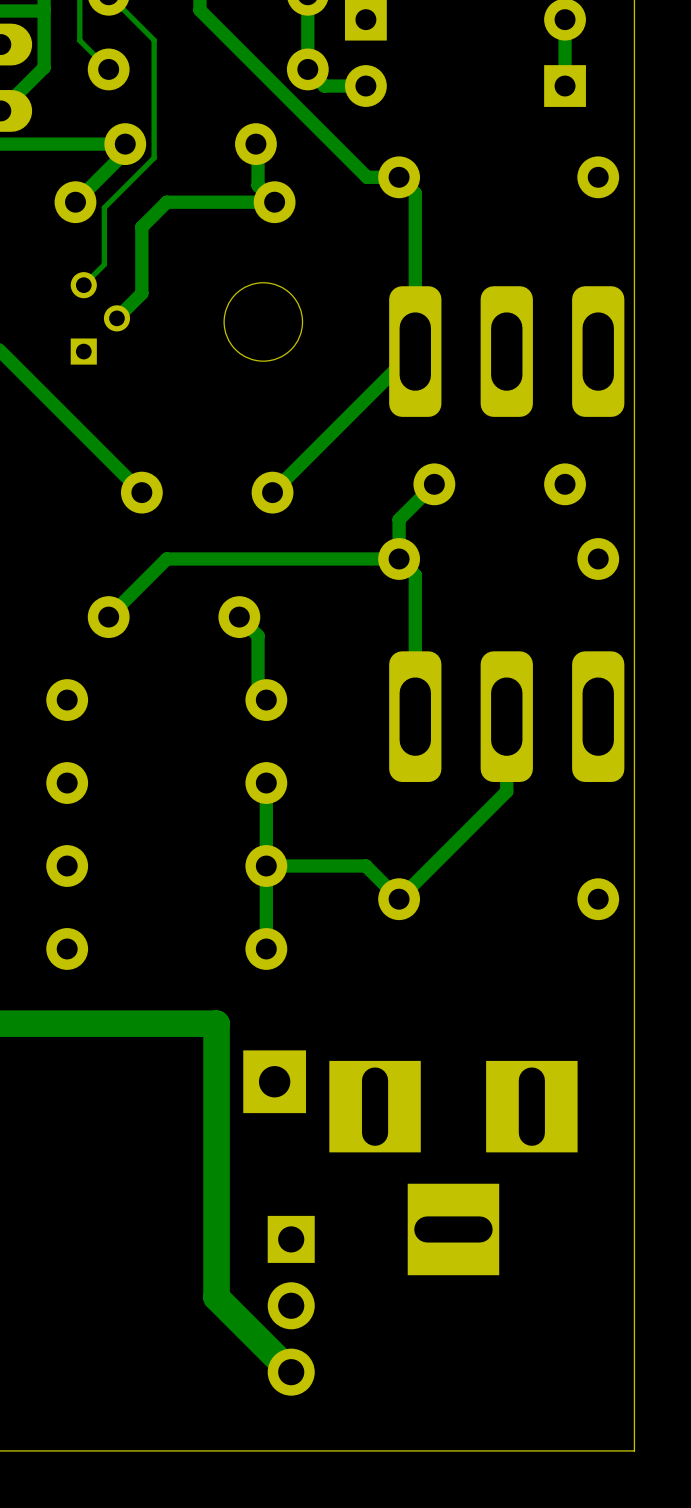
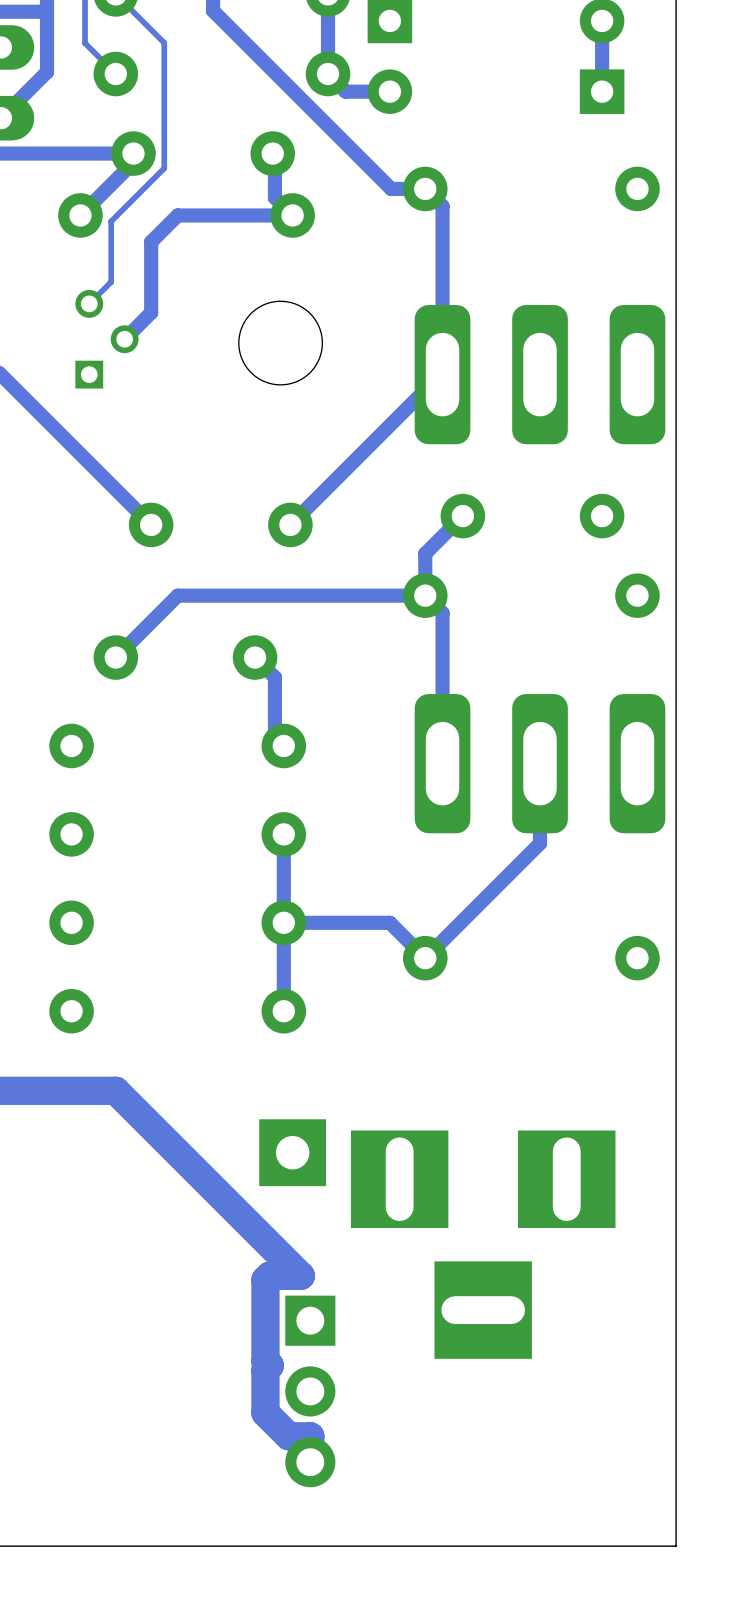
track: (108, 1023) (216, 1023) (216, 1297) (291, 1372) -> (115, 1090) (300, 1275) (269, 1275) (265, 1279) (265, 1361) (269, 1365)
track: none -> (269, 1365) (265, 1369) (265, 1412) (288, 1436) (310, 1436) (310, 1462)

